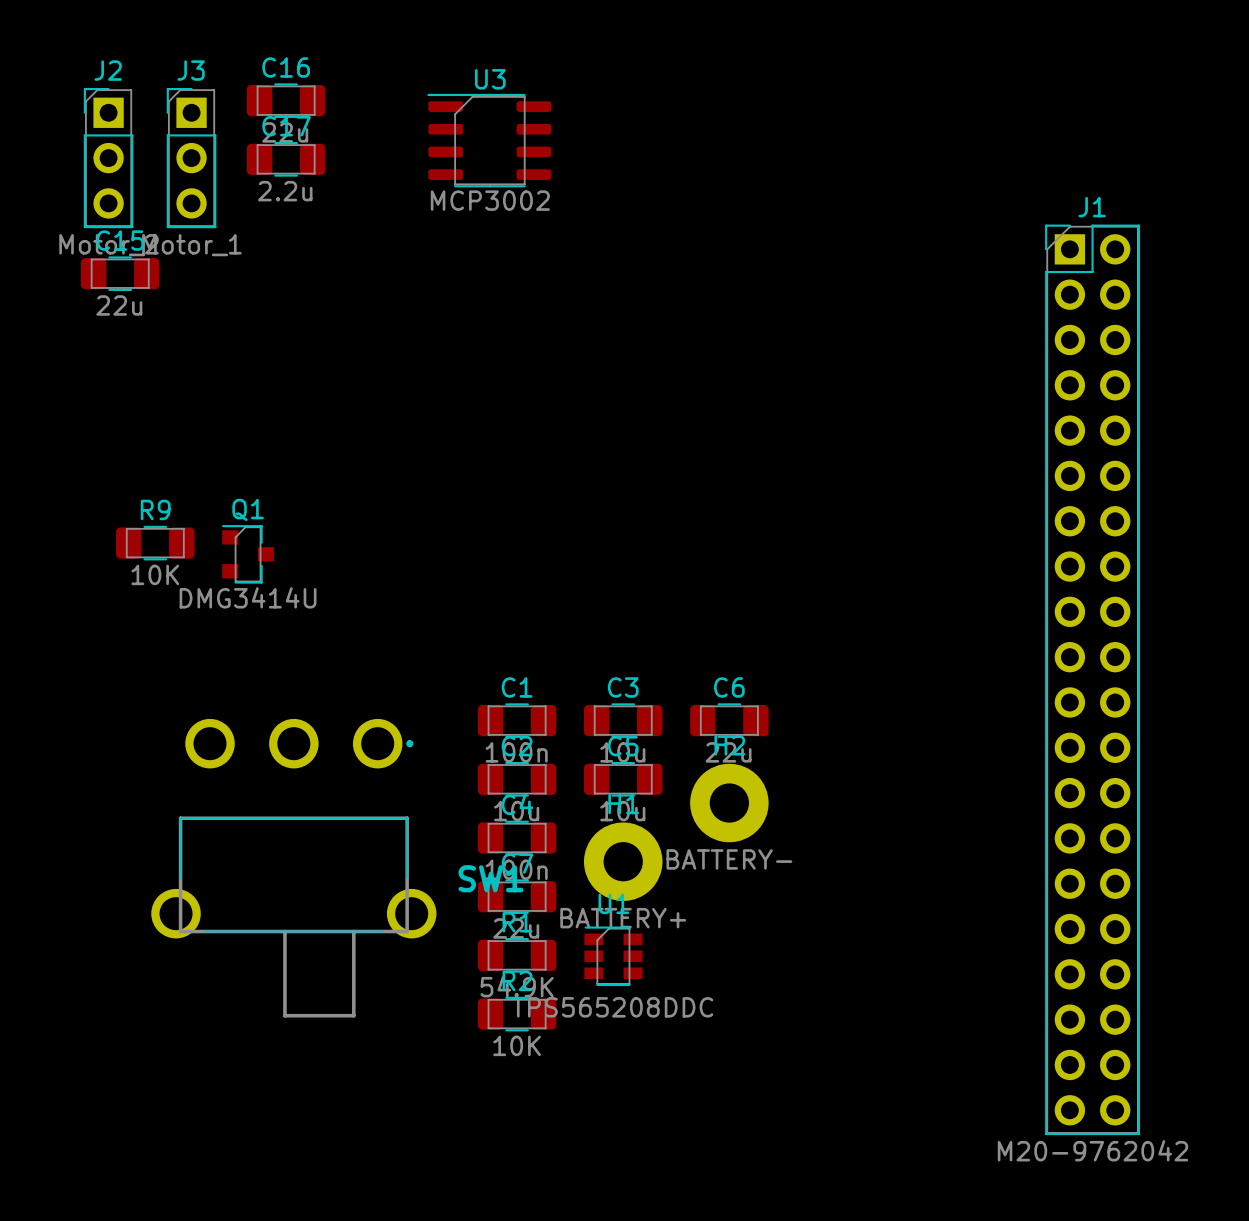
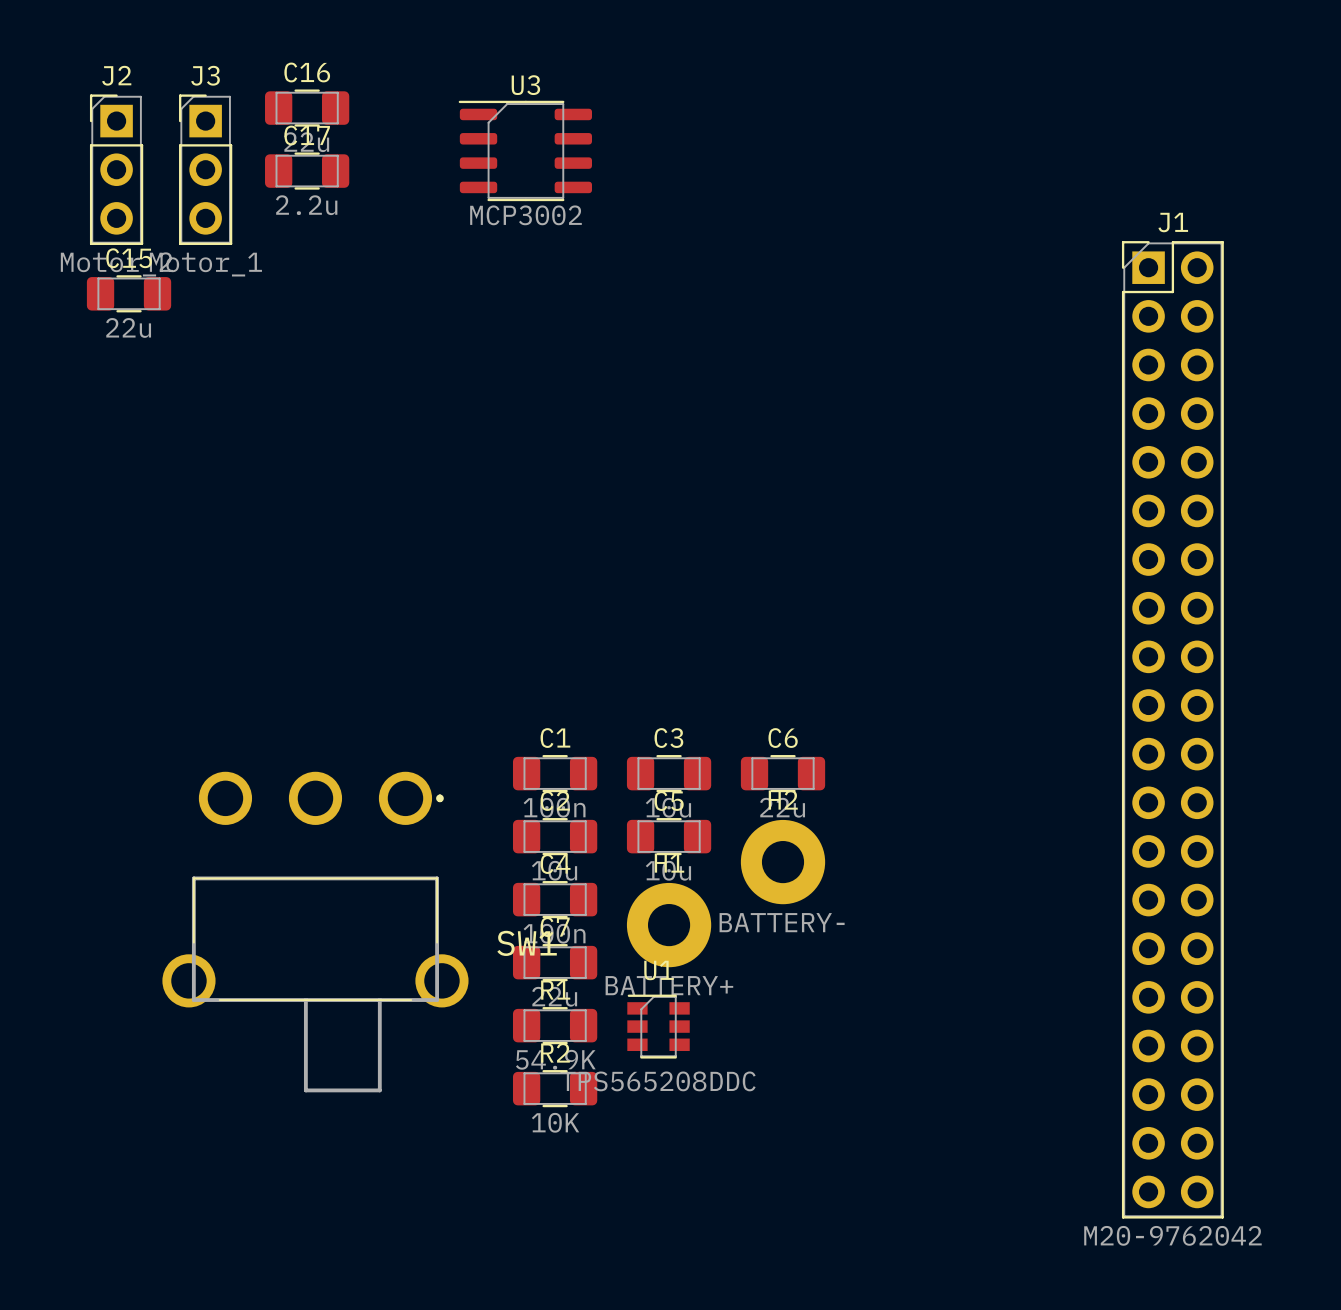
R9: 10K (155, 543) -> none
Q1: DMG3414U (247, 554) -> none

